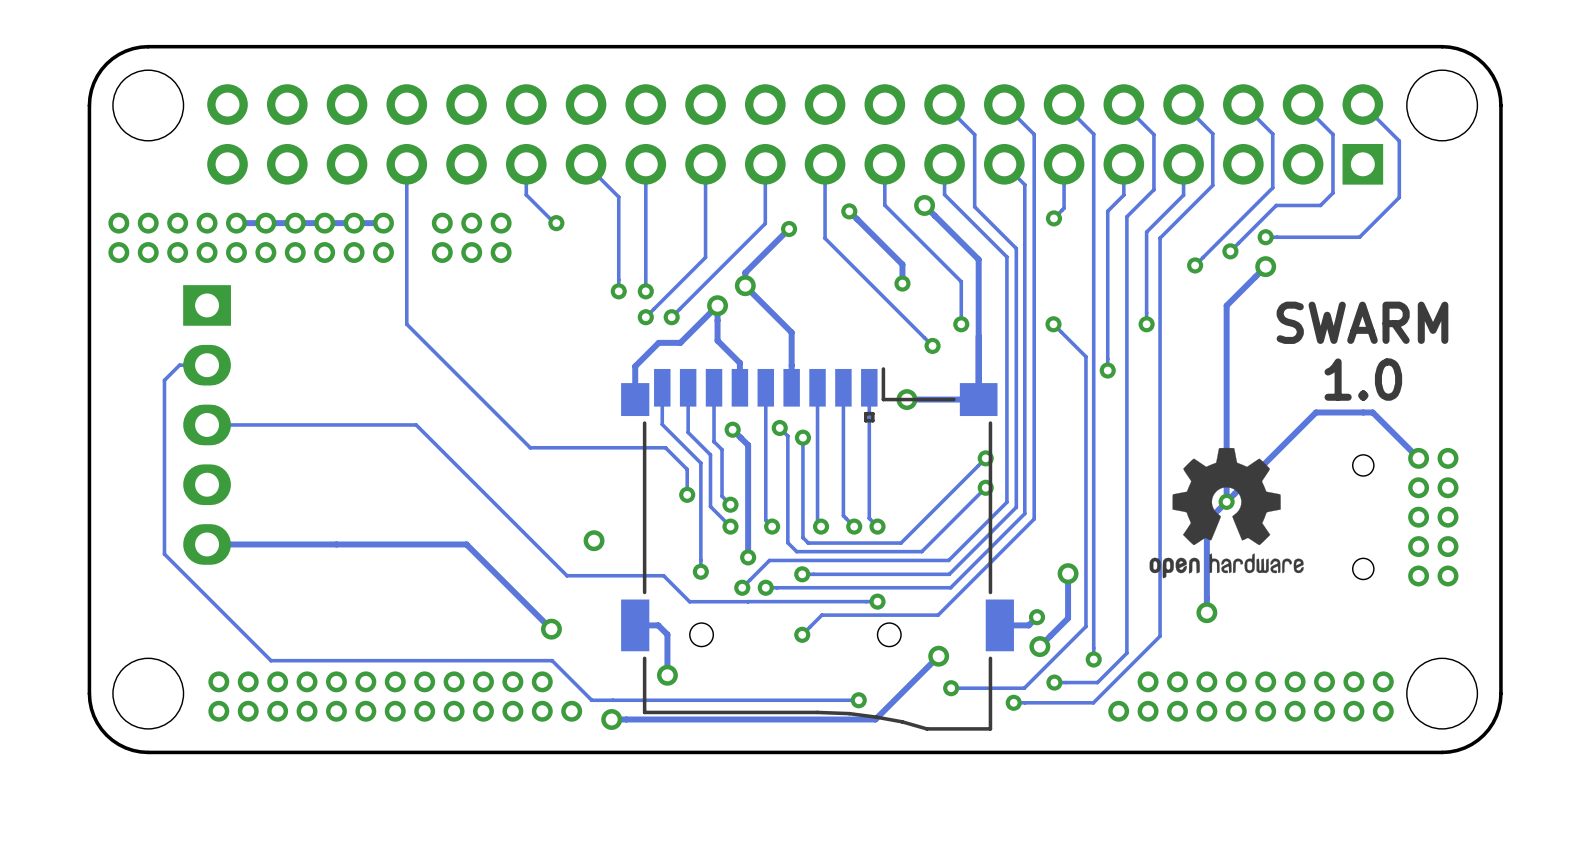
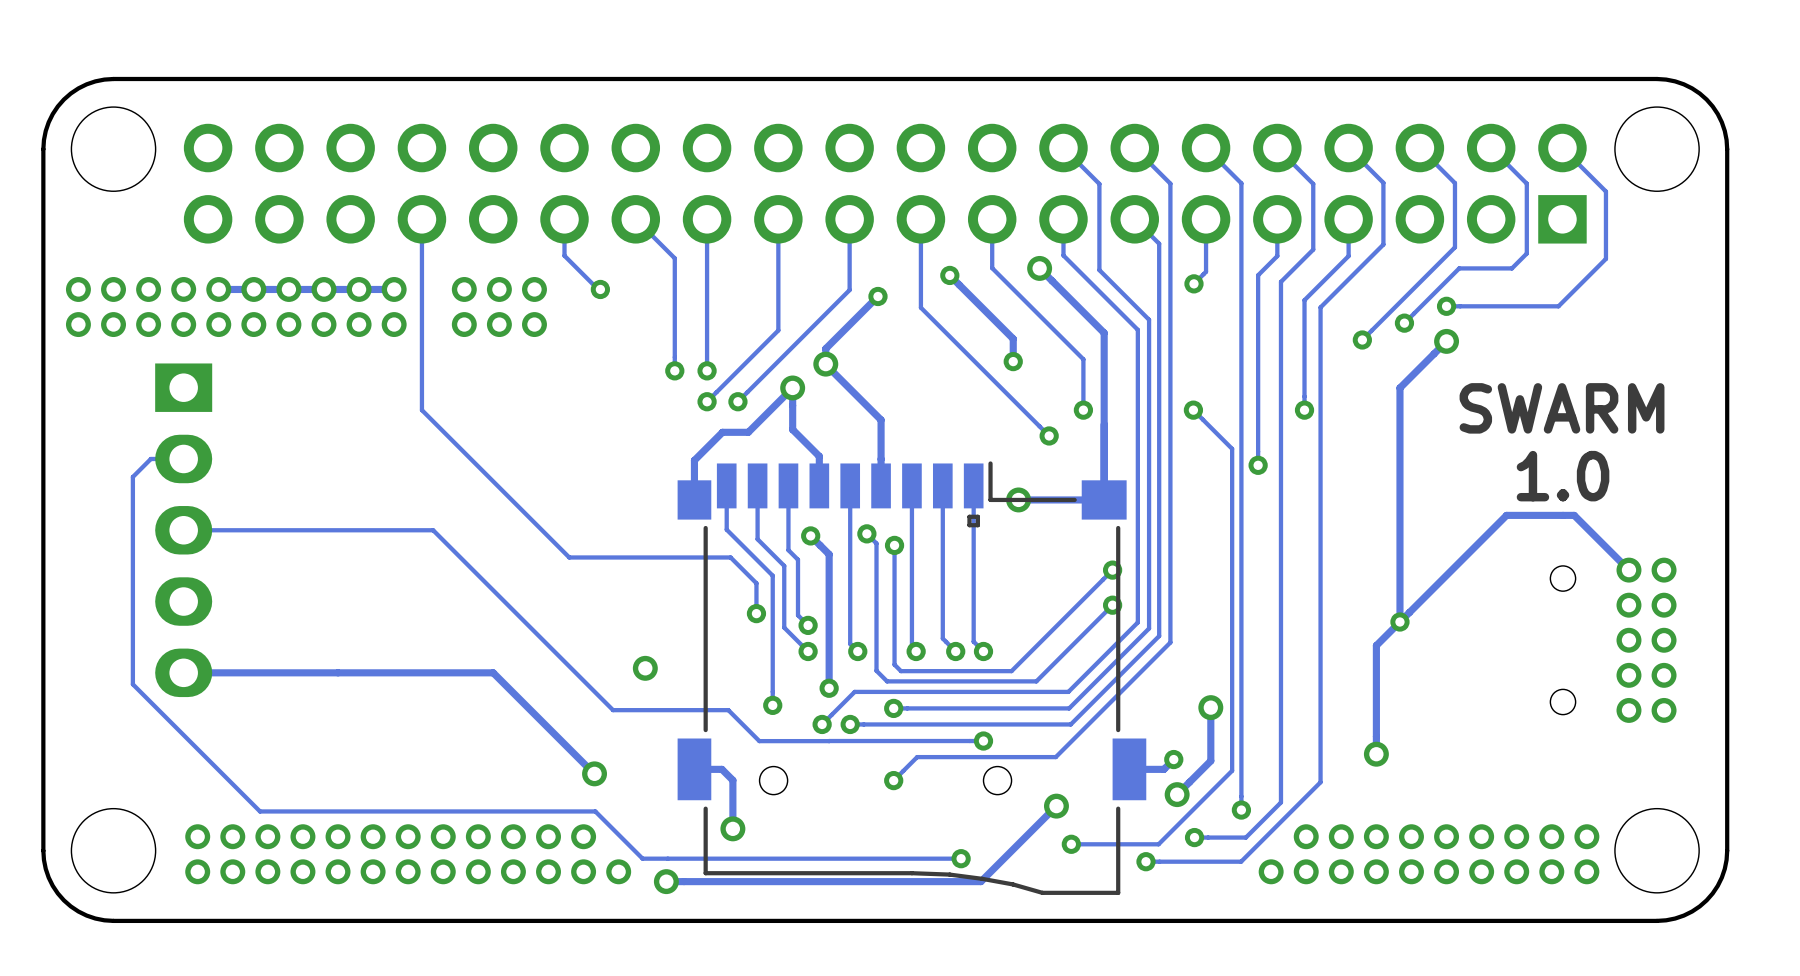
drawing: [1149, 447, 1304, 579] -> none

